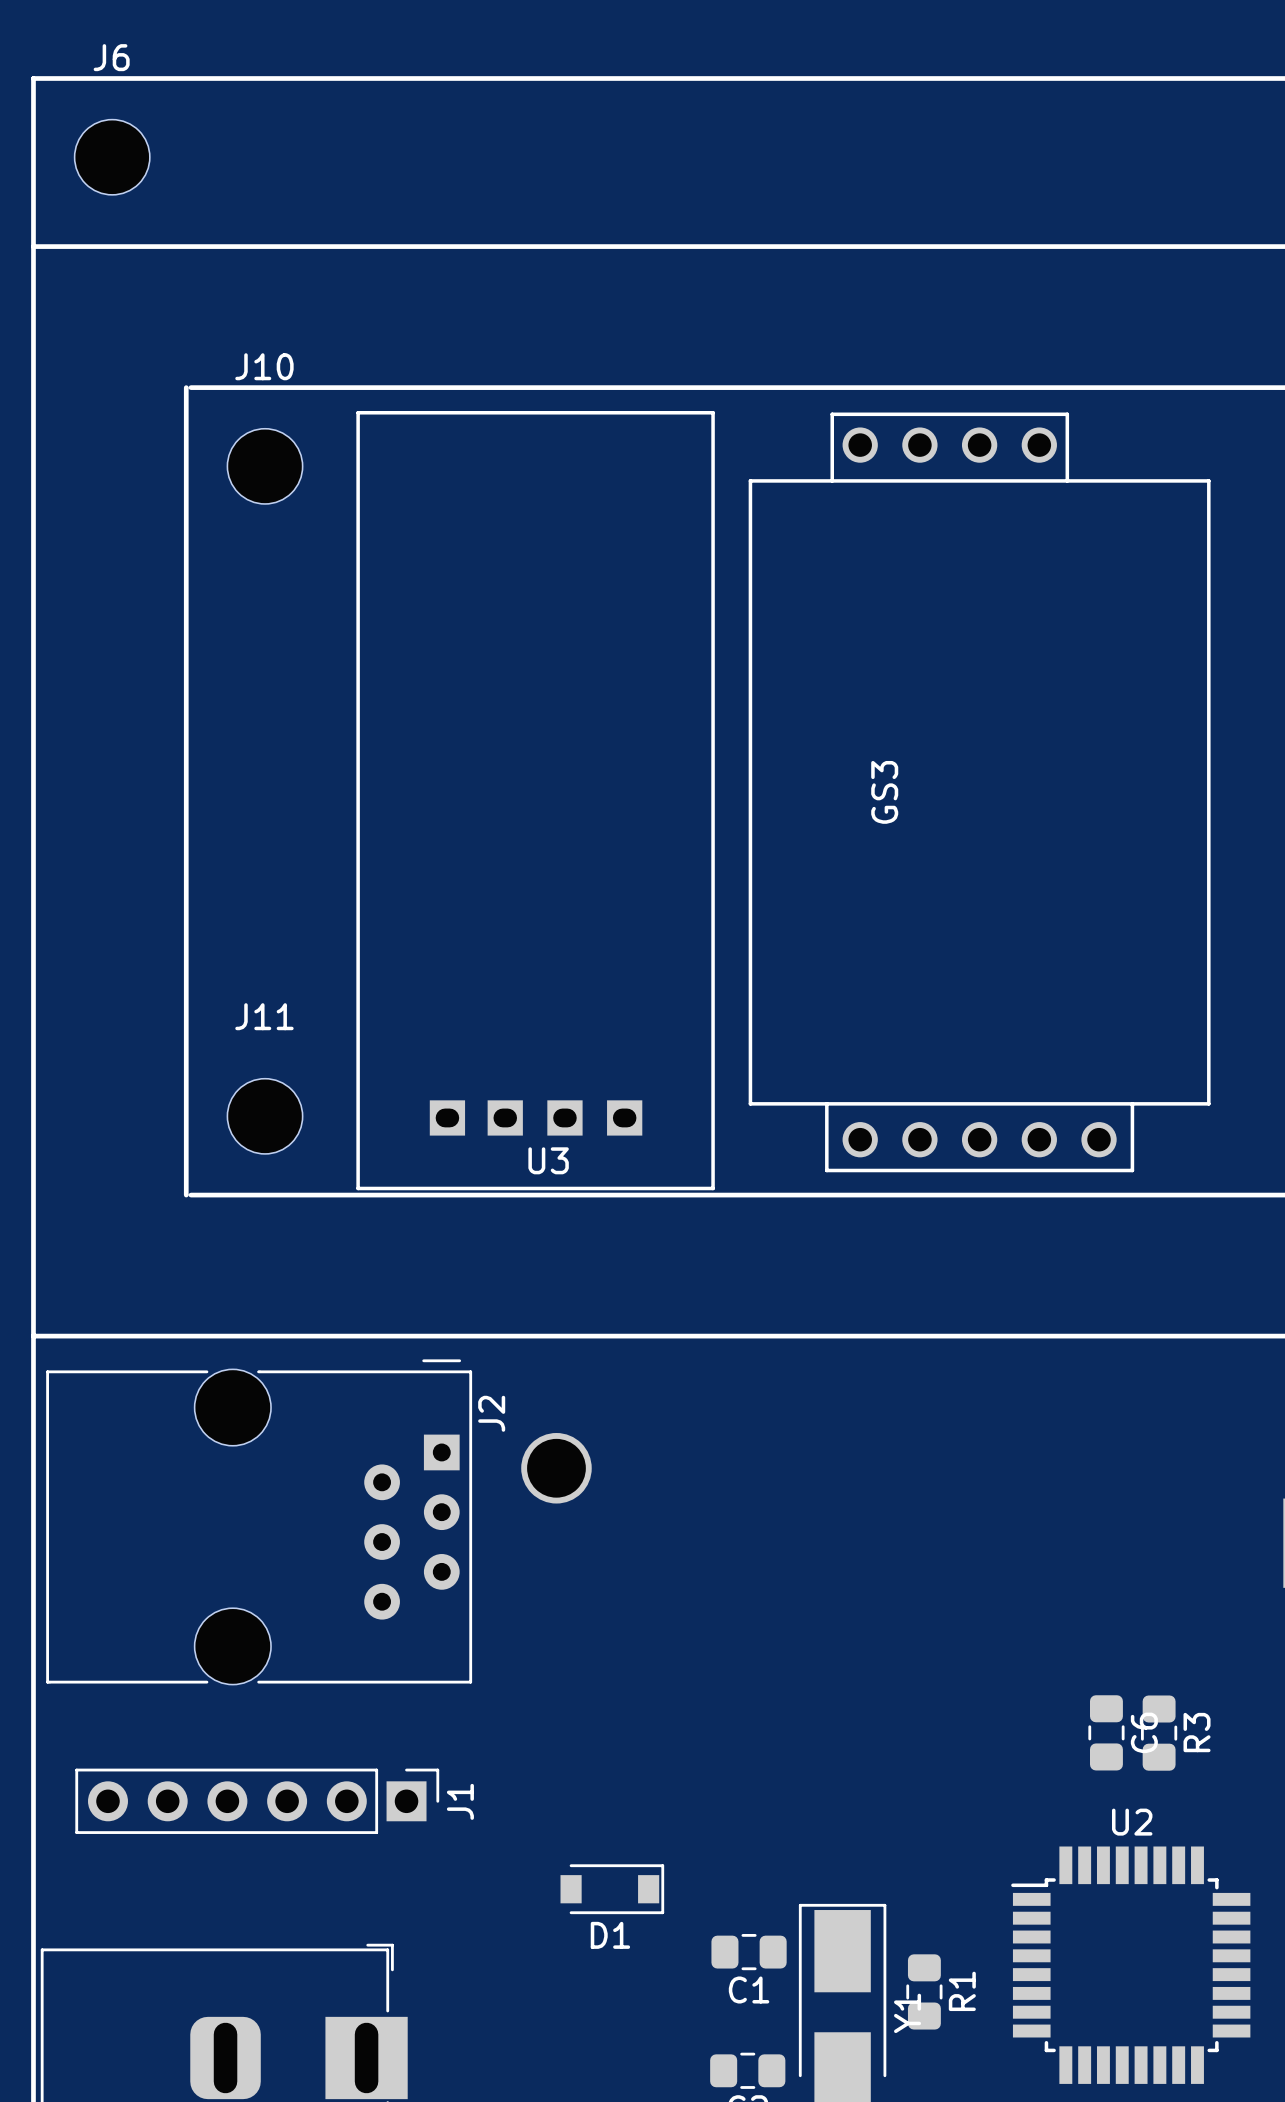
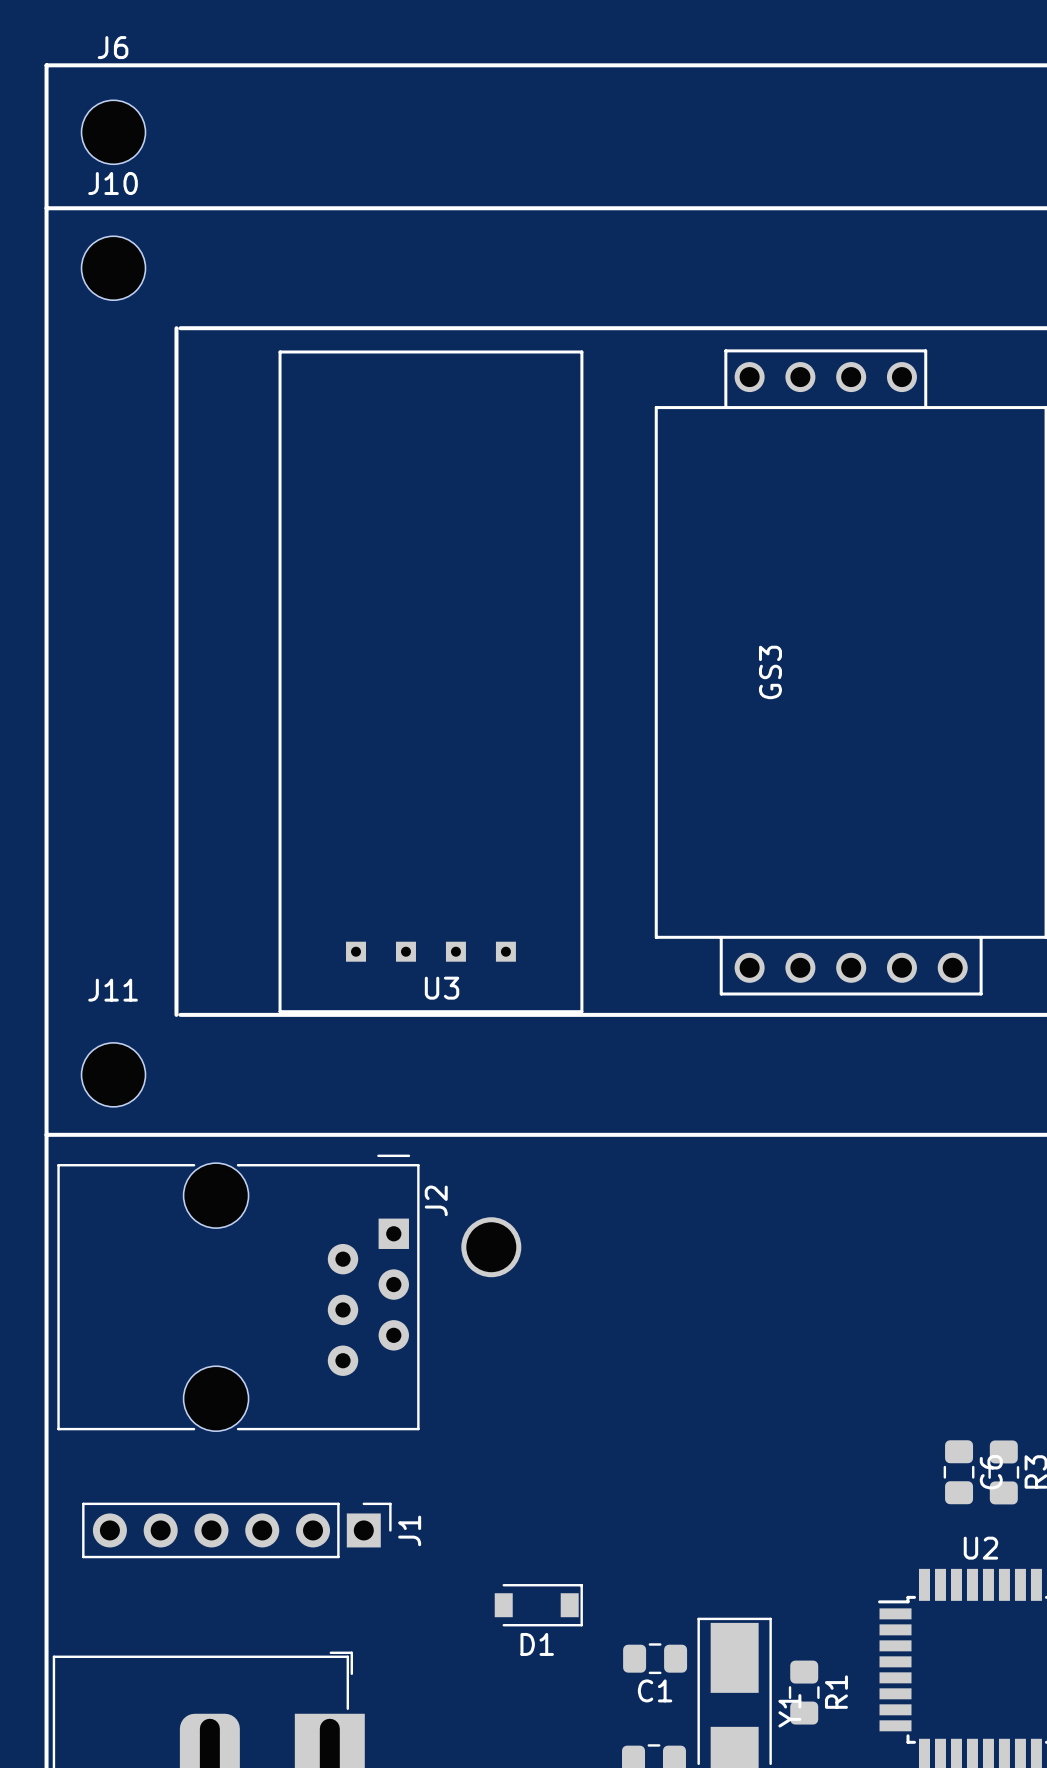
U3 footprint: [356, 411, 715, 1191] -> [278, 350, 584, 1014]
J10 position: (265, 466) -> (113, 268)
J11 position: (265, 1116) -> (113, 1074)

